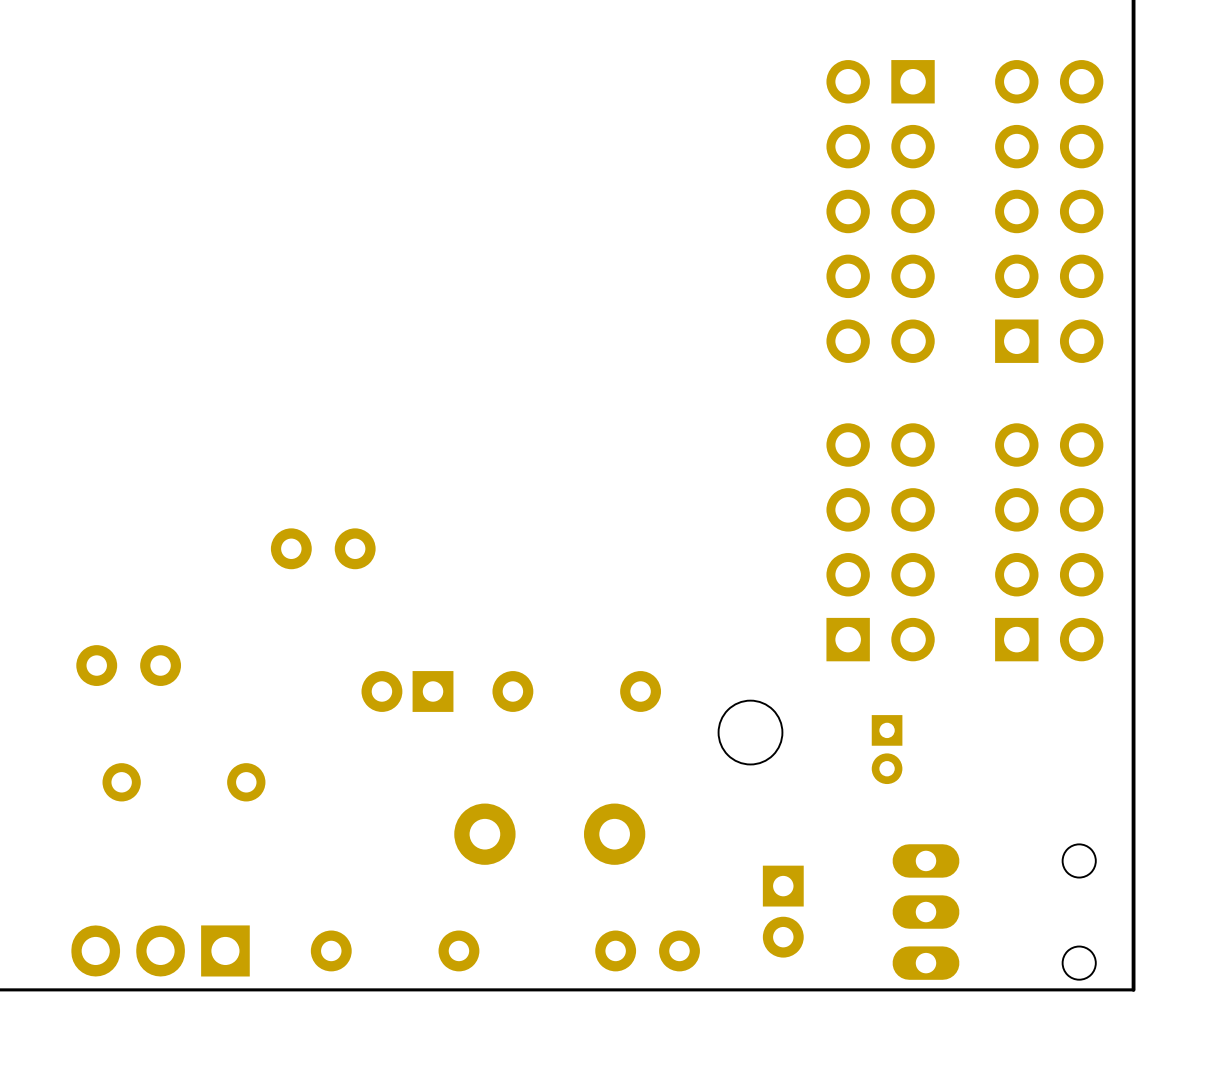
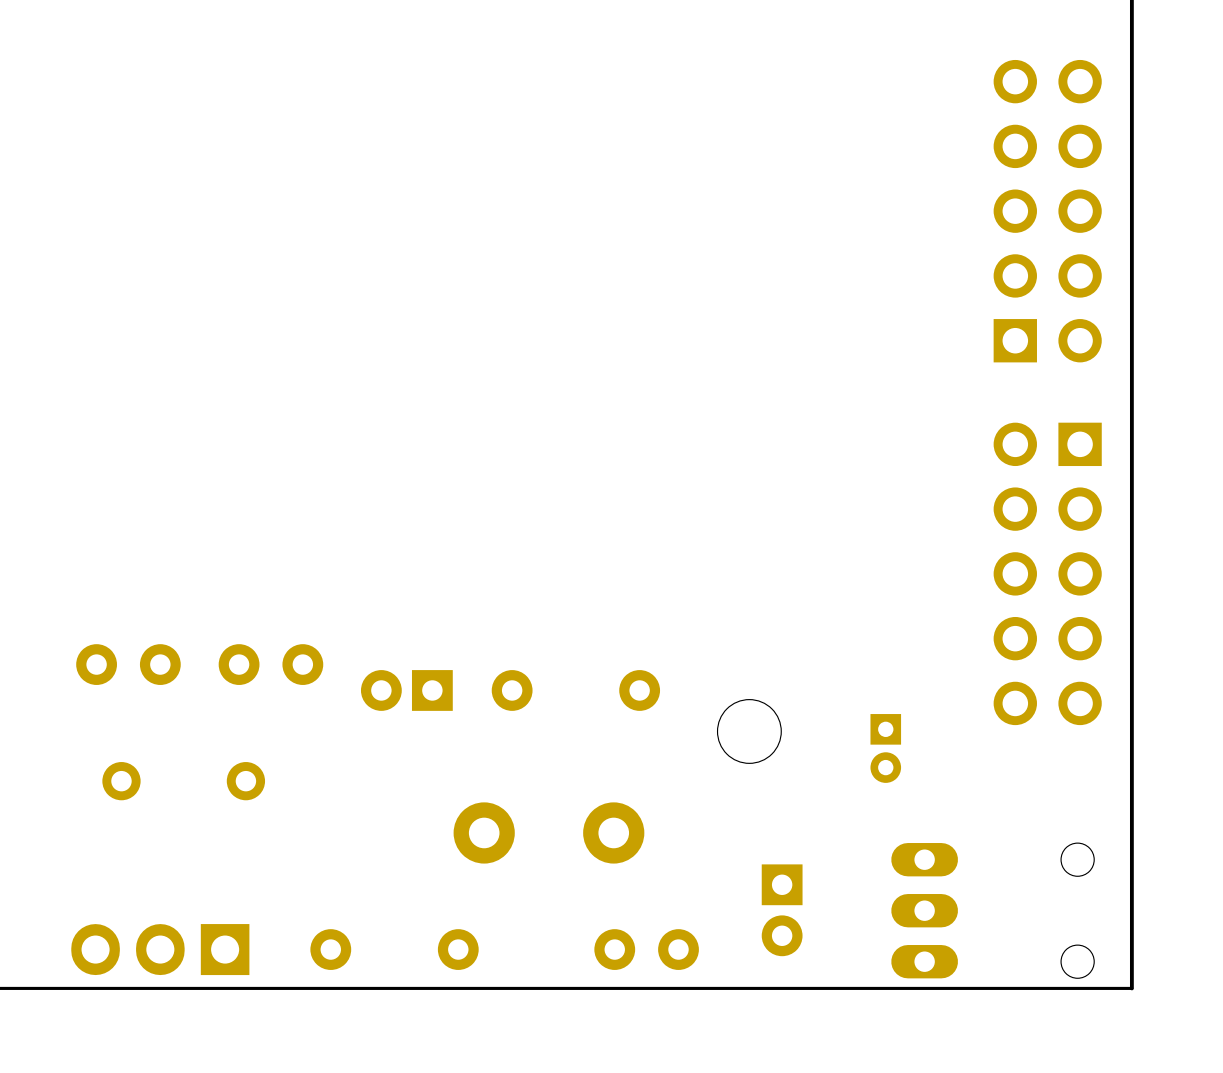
part position: (880, 211) -> (1047, 573)
part: (880, 542) -> none
part: (1049, 542) -> none
part position: (323, 548) -> (270, 664)

